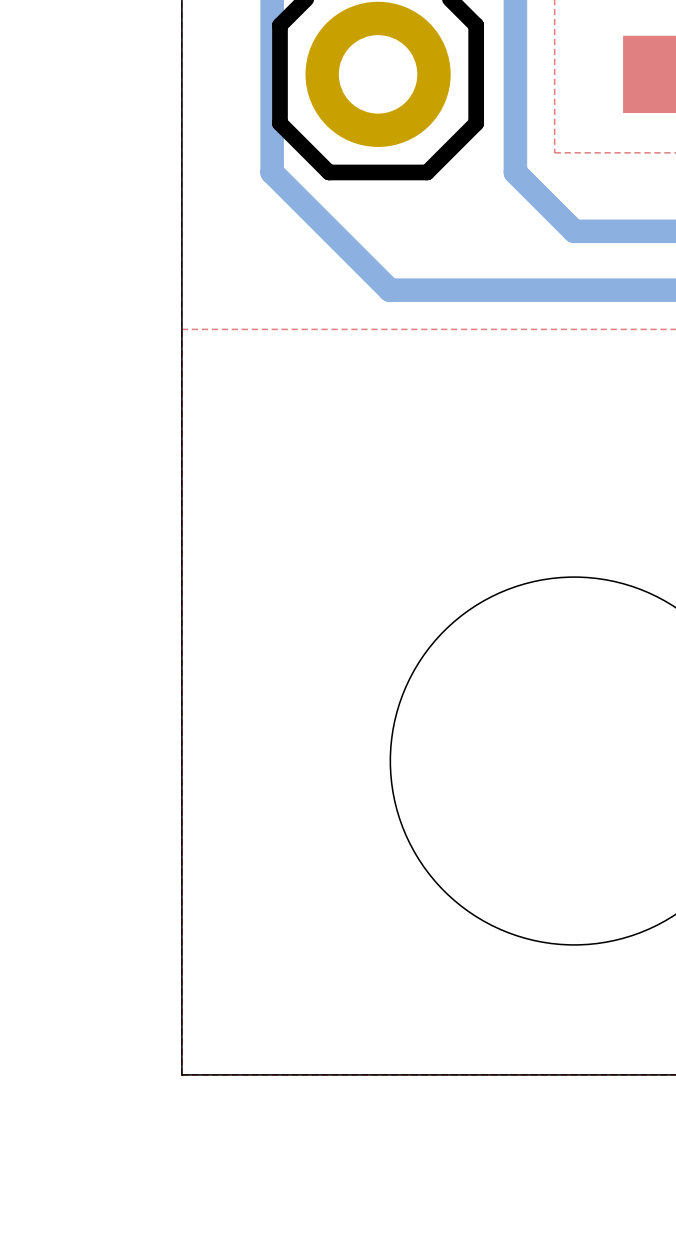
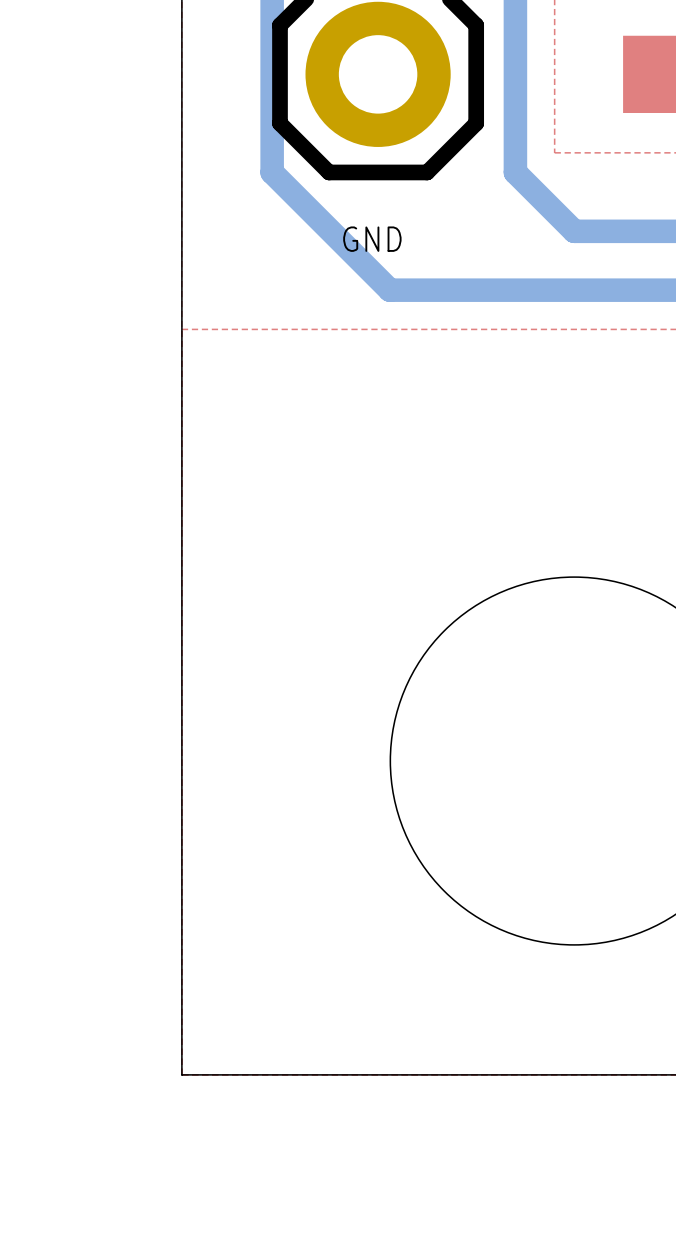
text: none -> GND (372, 239)

